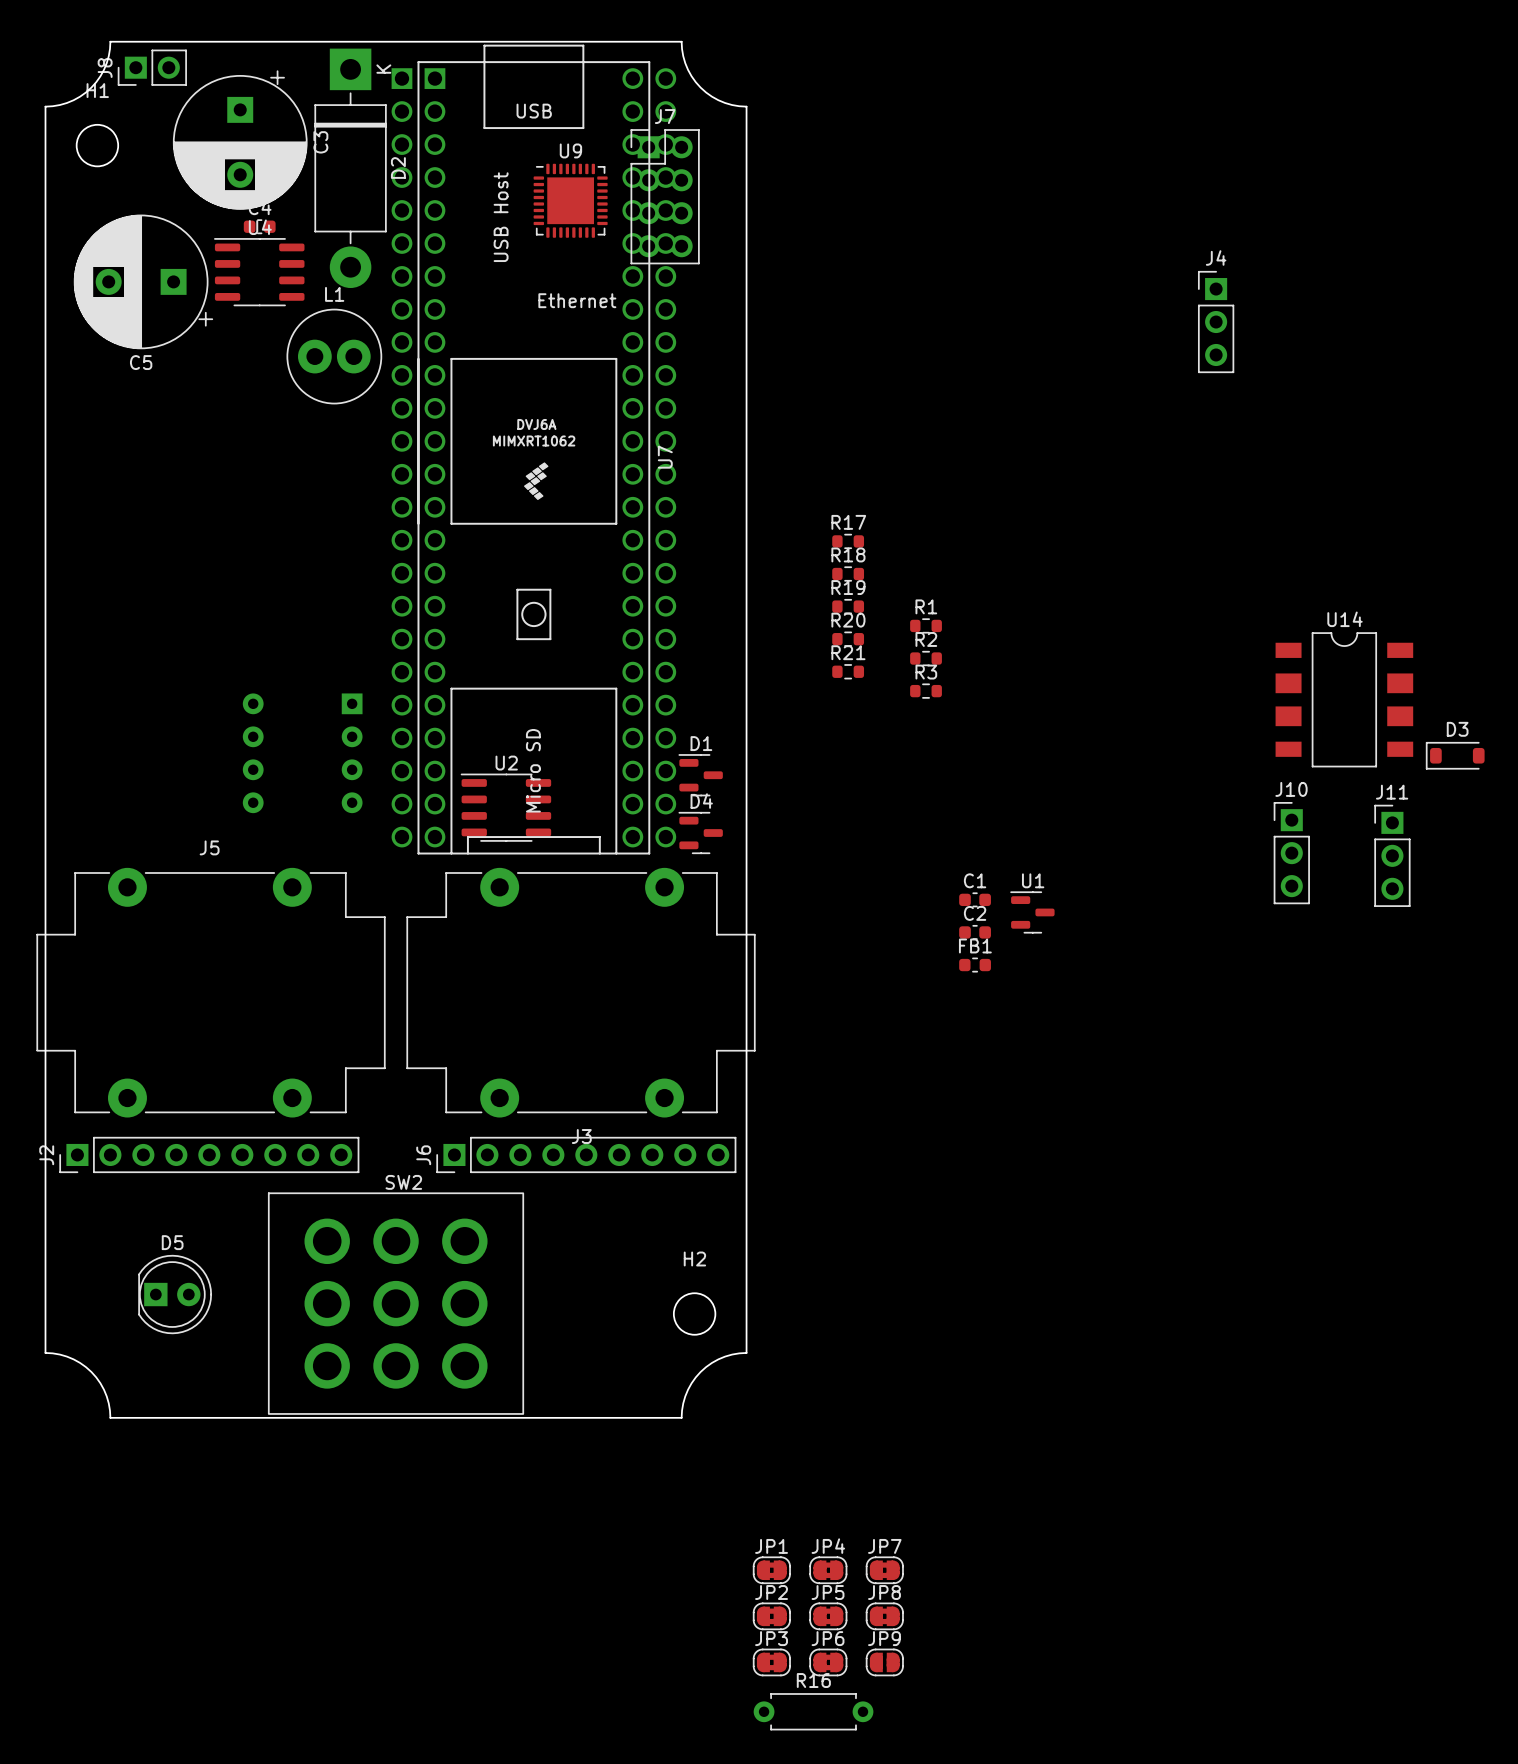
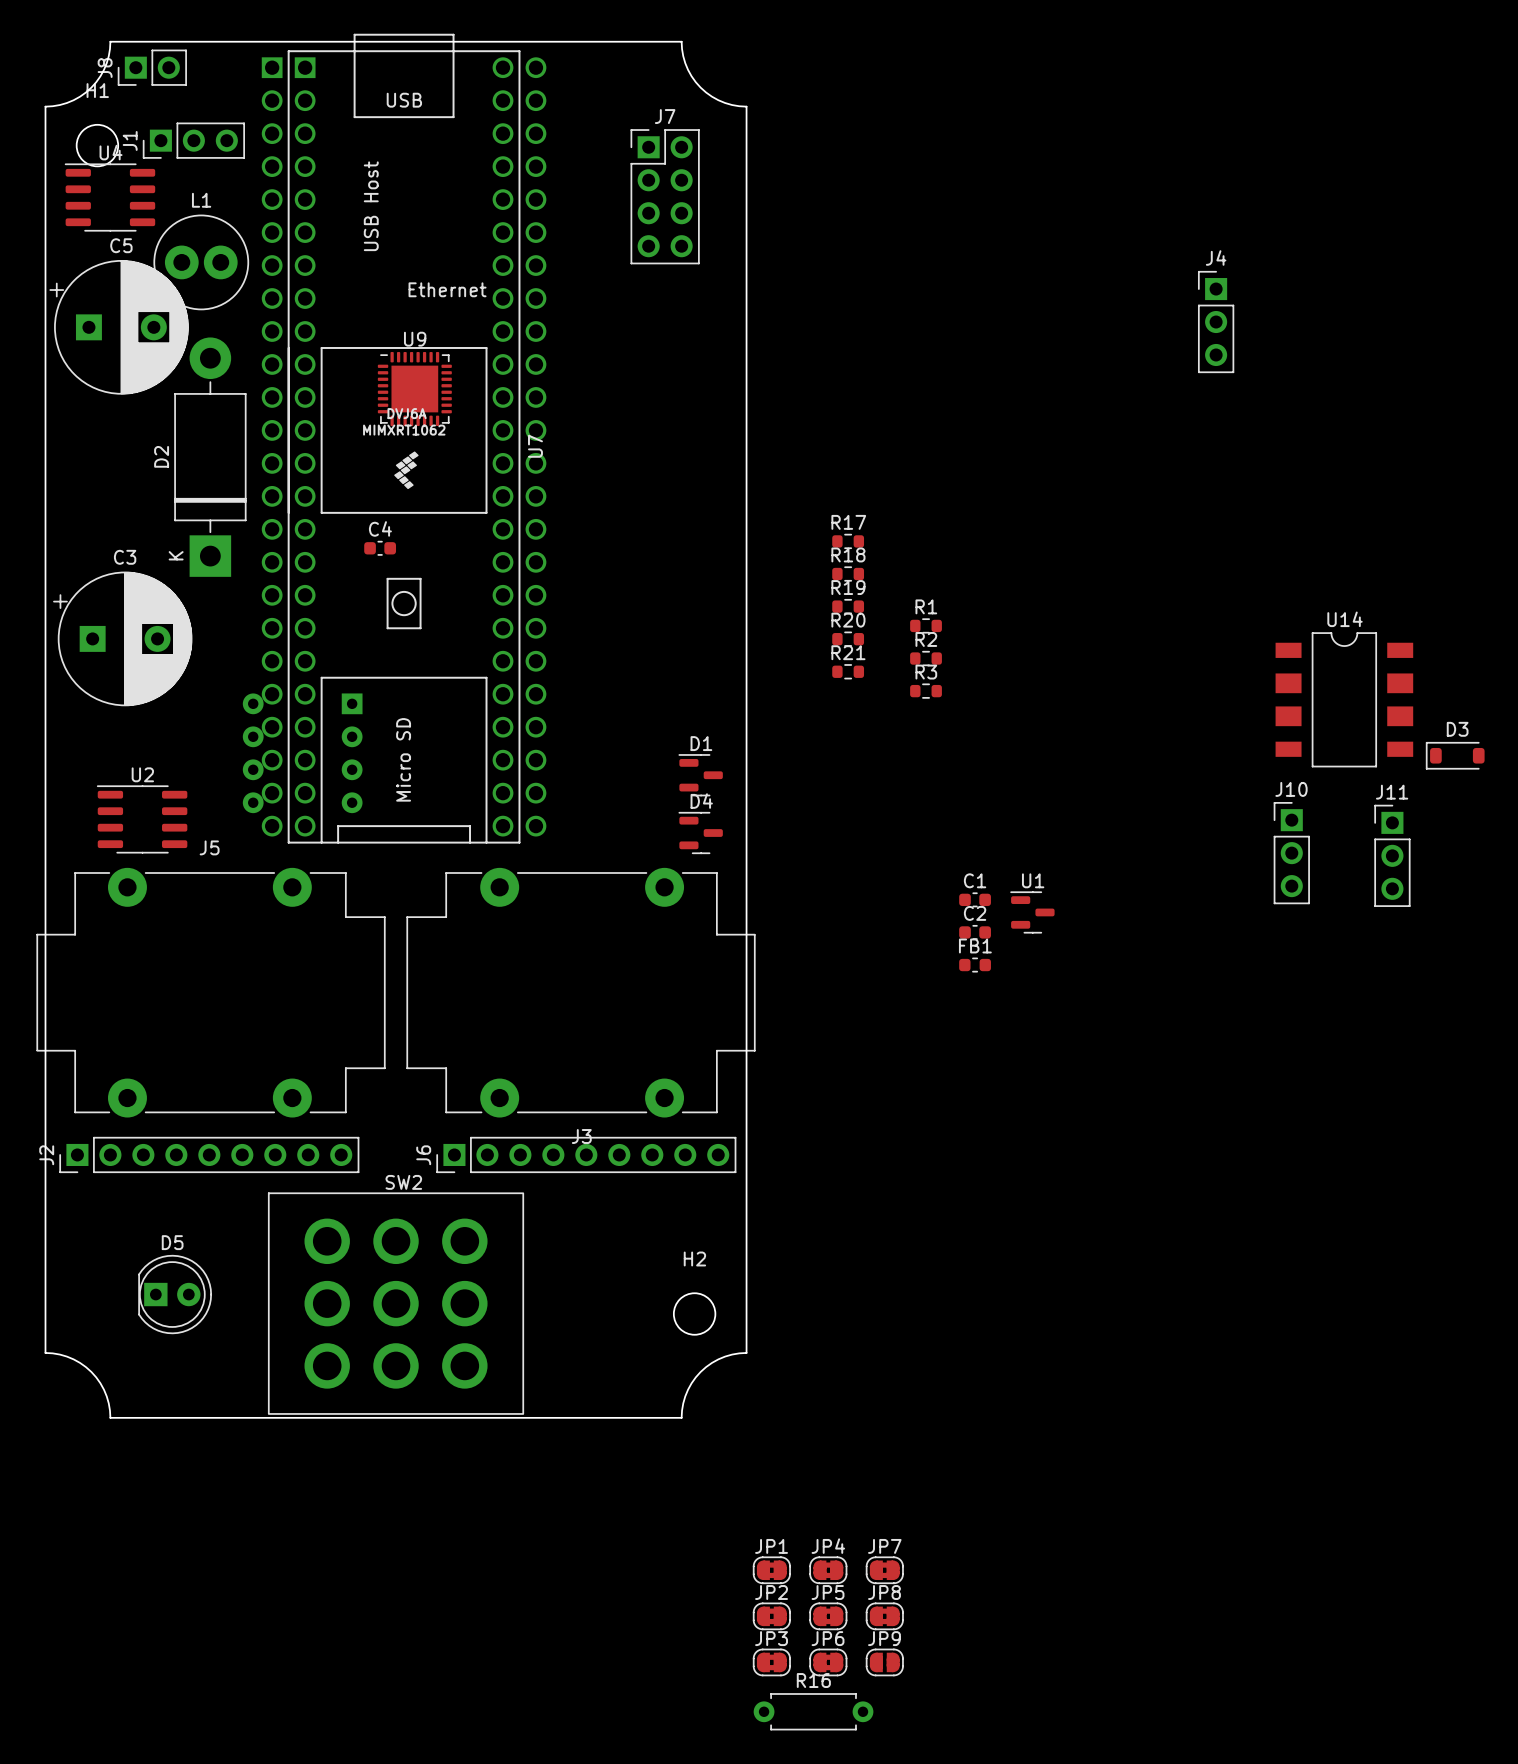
J1: none -> (193, 140)
C3 rotation: 0° (240, 140) -> 90° counterclockwise (122, 638)
C3 position: (240, 140) -> (122, 638)
D2 rotation: 0° (350, 168) -> 180° (210, 457)
D2 position: (350, 168) -> (210, 457)
U9 position: (570, 200) -> (414, 389)
C4 position: (259, 226) -> (380, 548)
U4 position: (259, 272) -> (110, 197)
C5 rotation: 0° (143, 281) -> 180° (119, 327)
L1 position: (334, 356) -> (201, 262)
U7 position: (533, 449) -> (404, 438)
U2 position: (505, 807) -> (142, 819)

